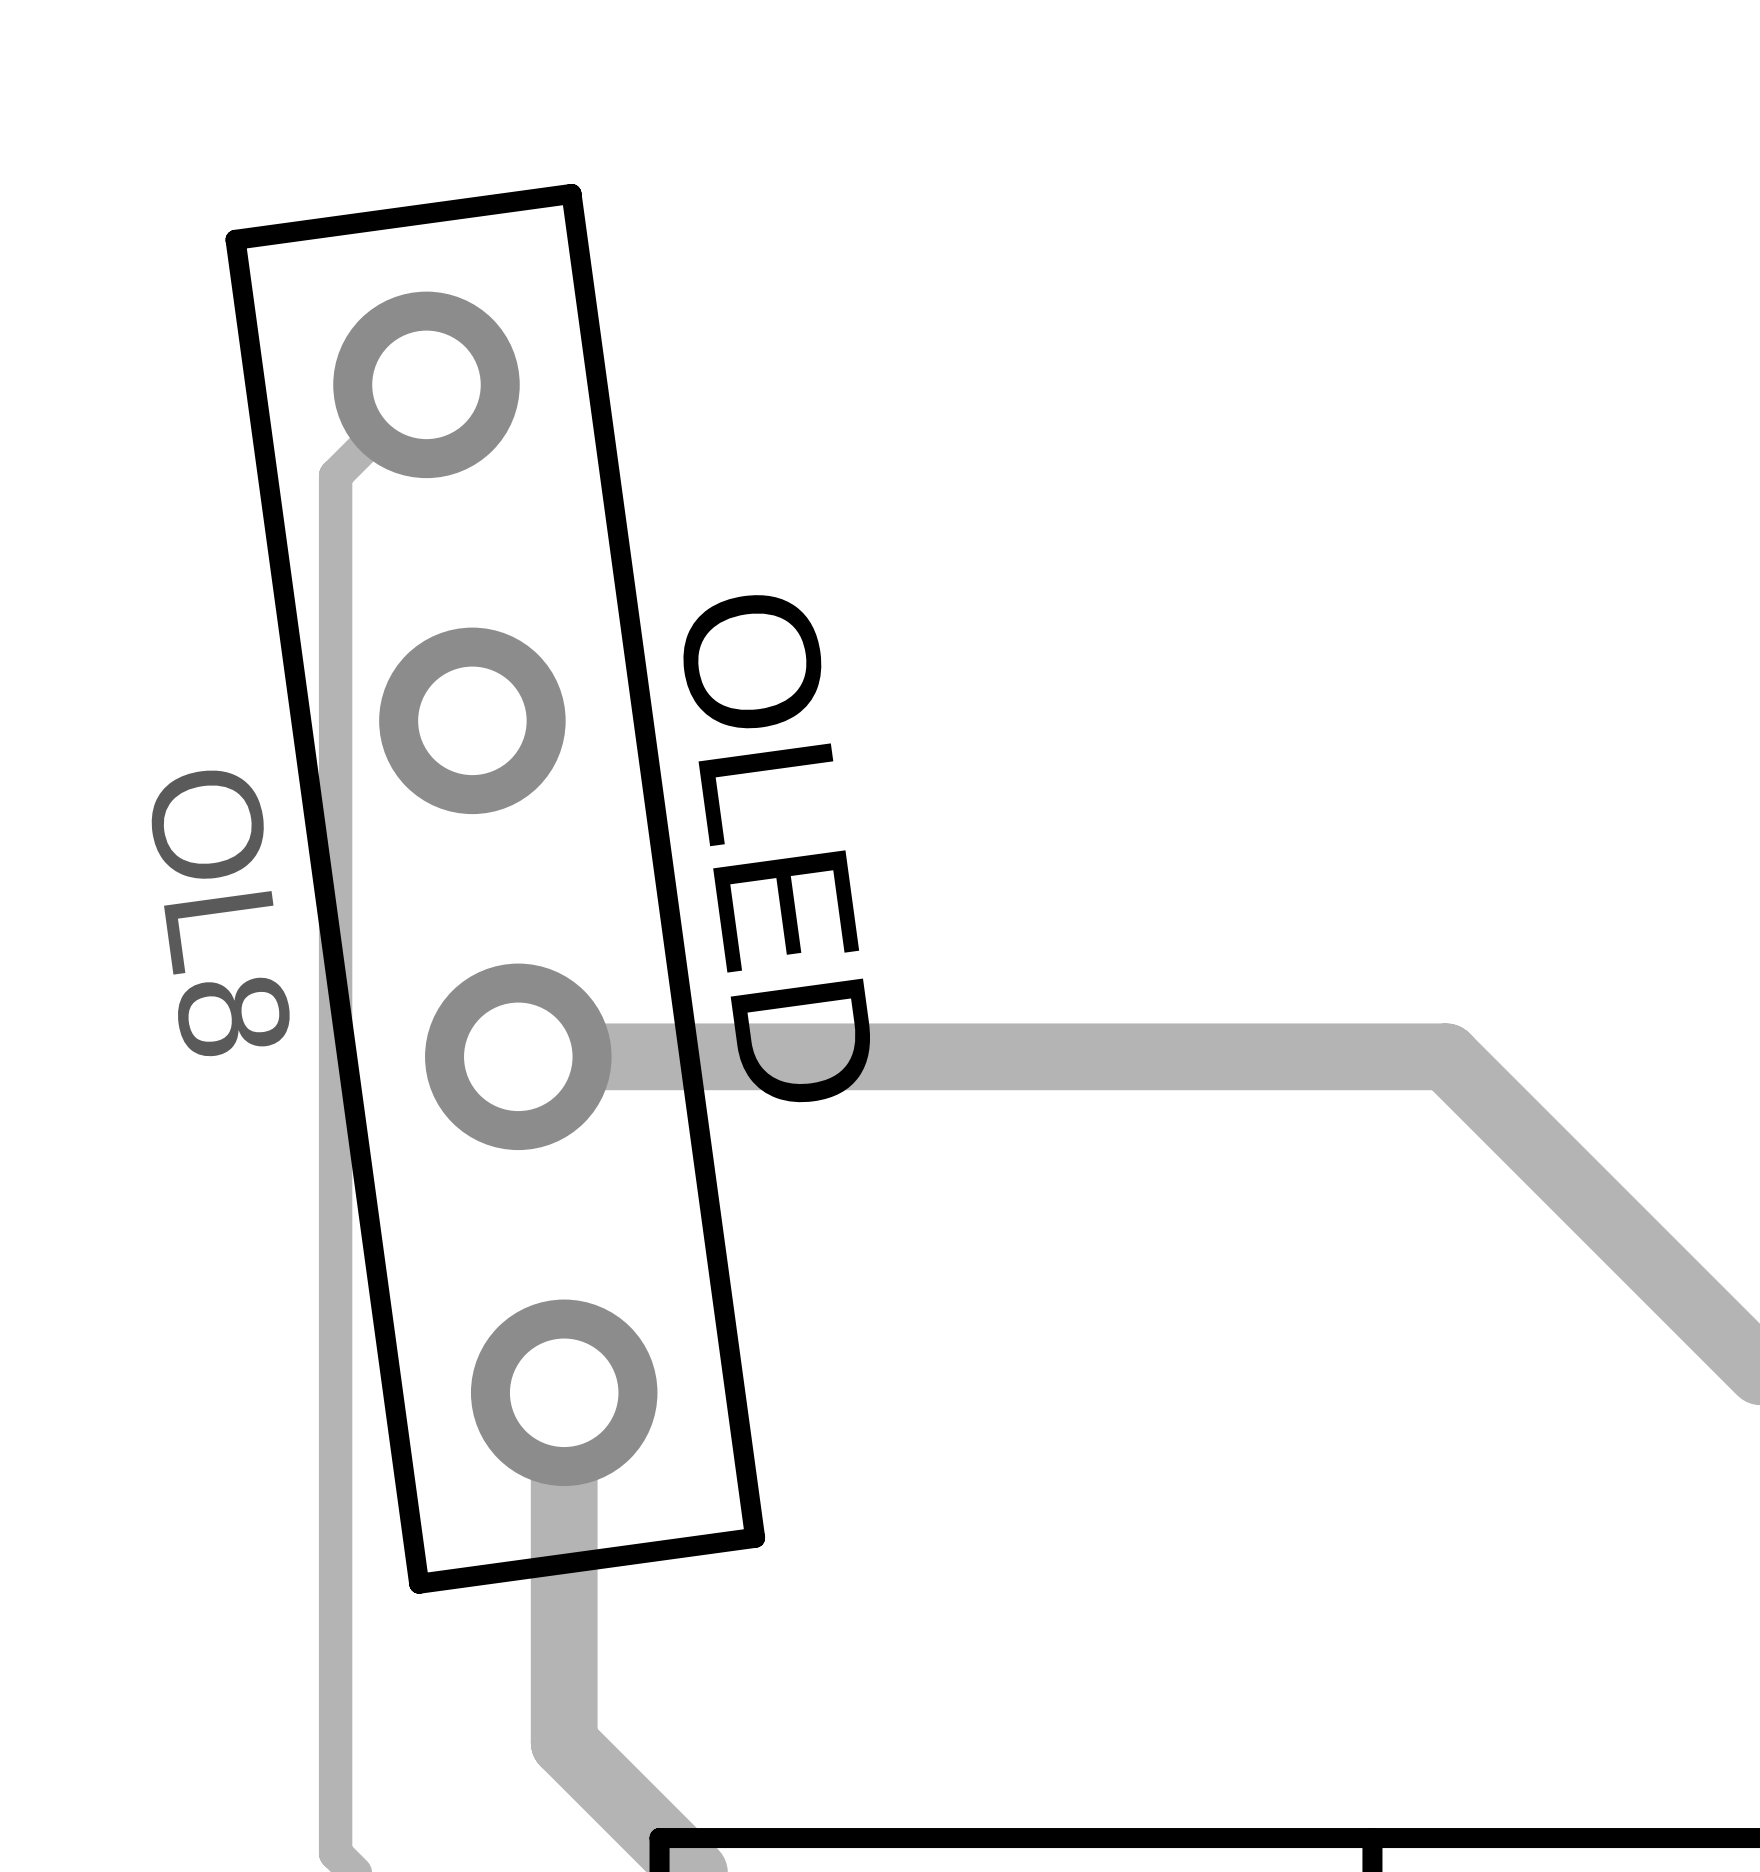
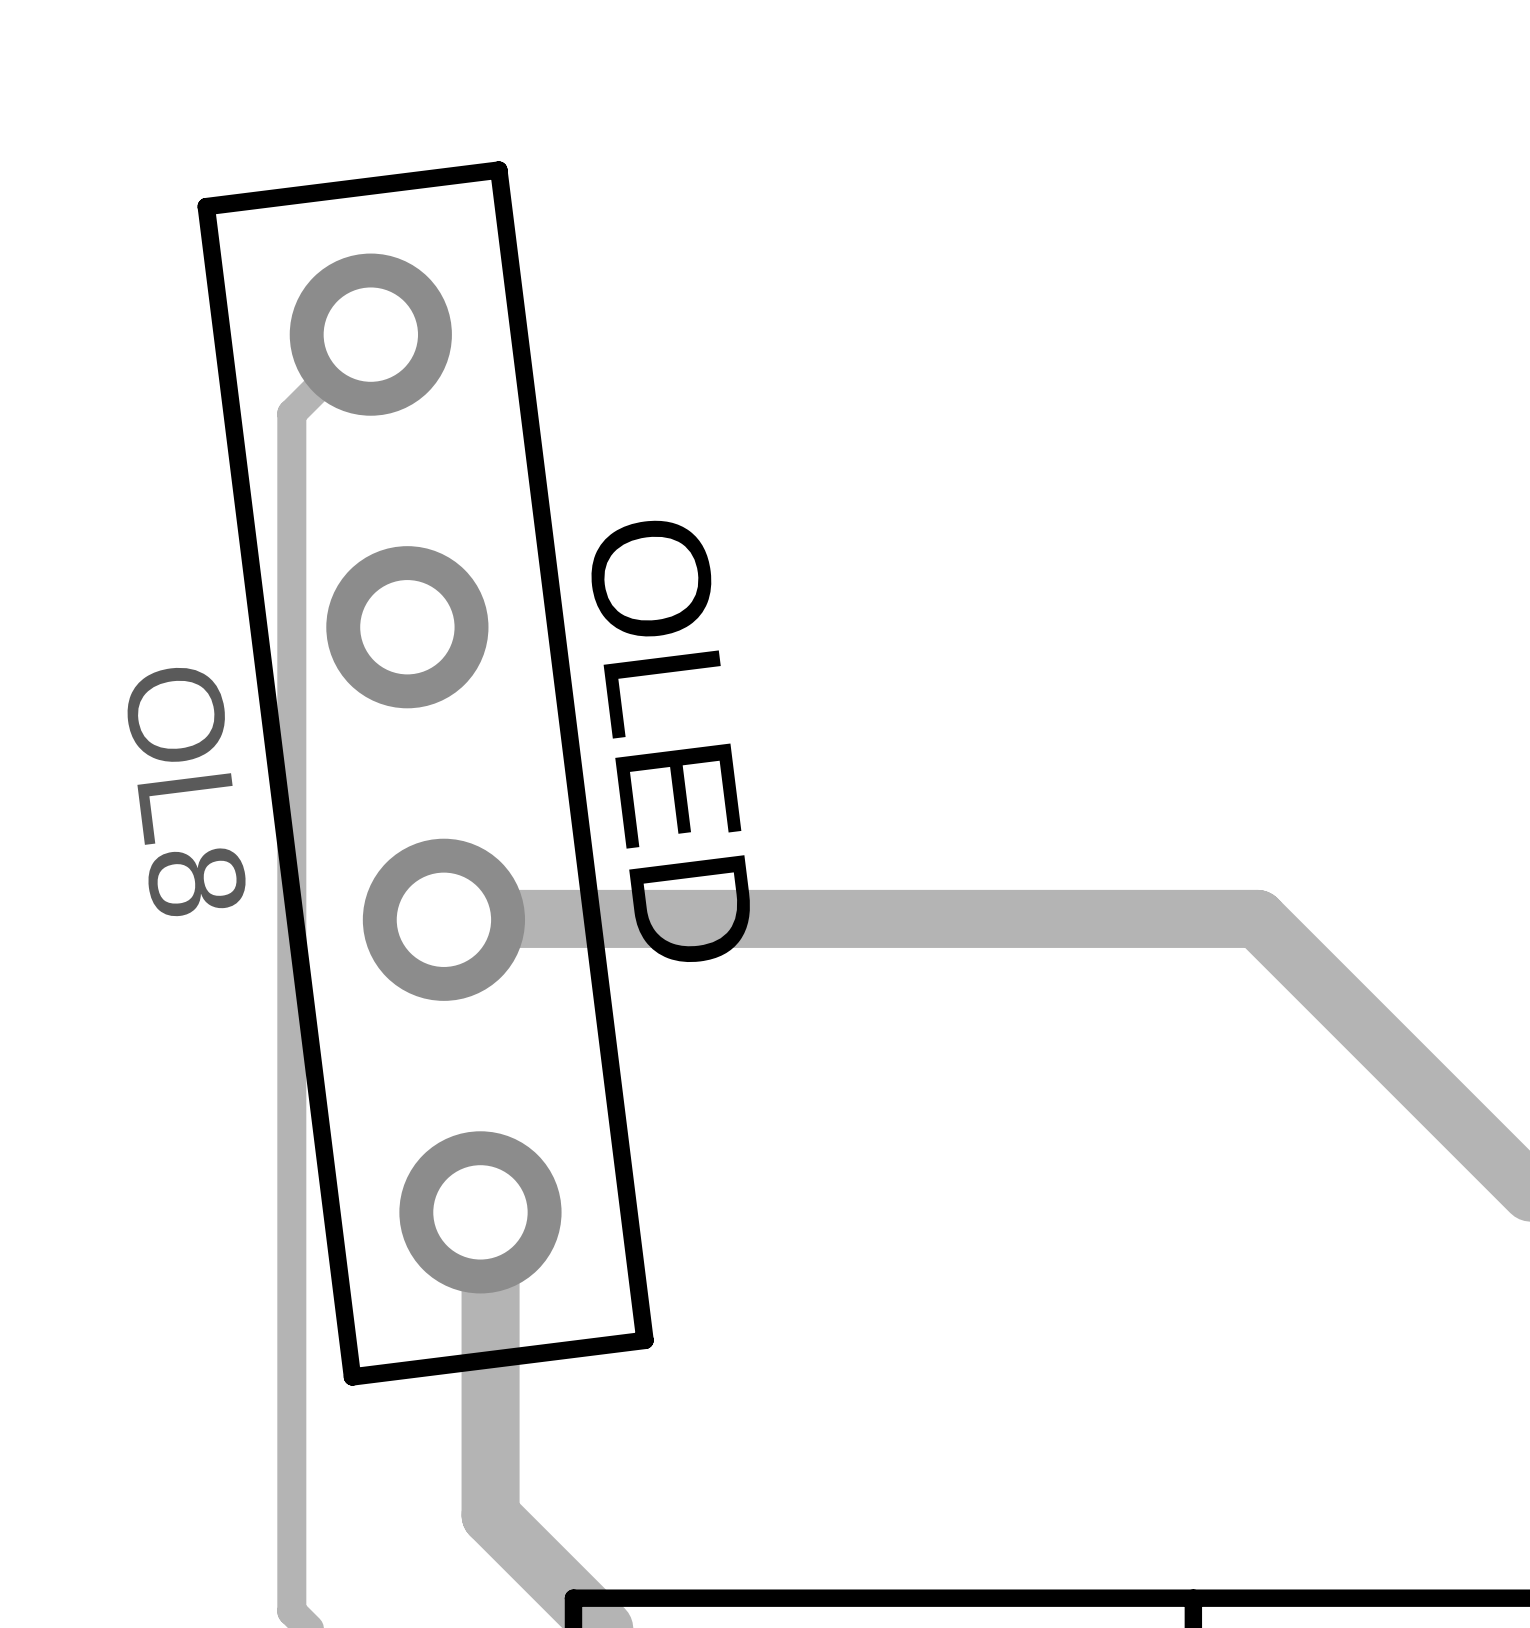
OL8 rotation: 0° (495, 888) -> 0.7° clockwise (425, 773)

